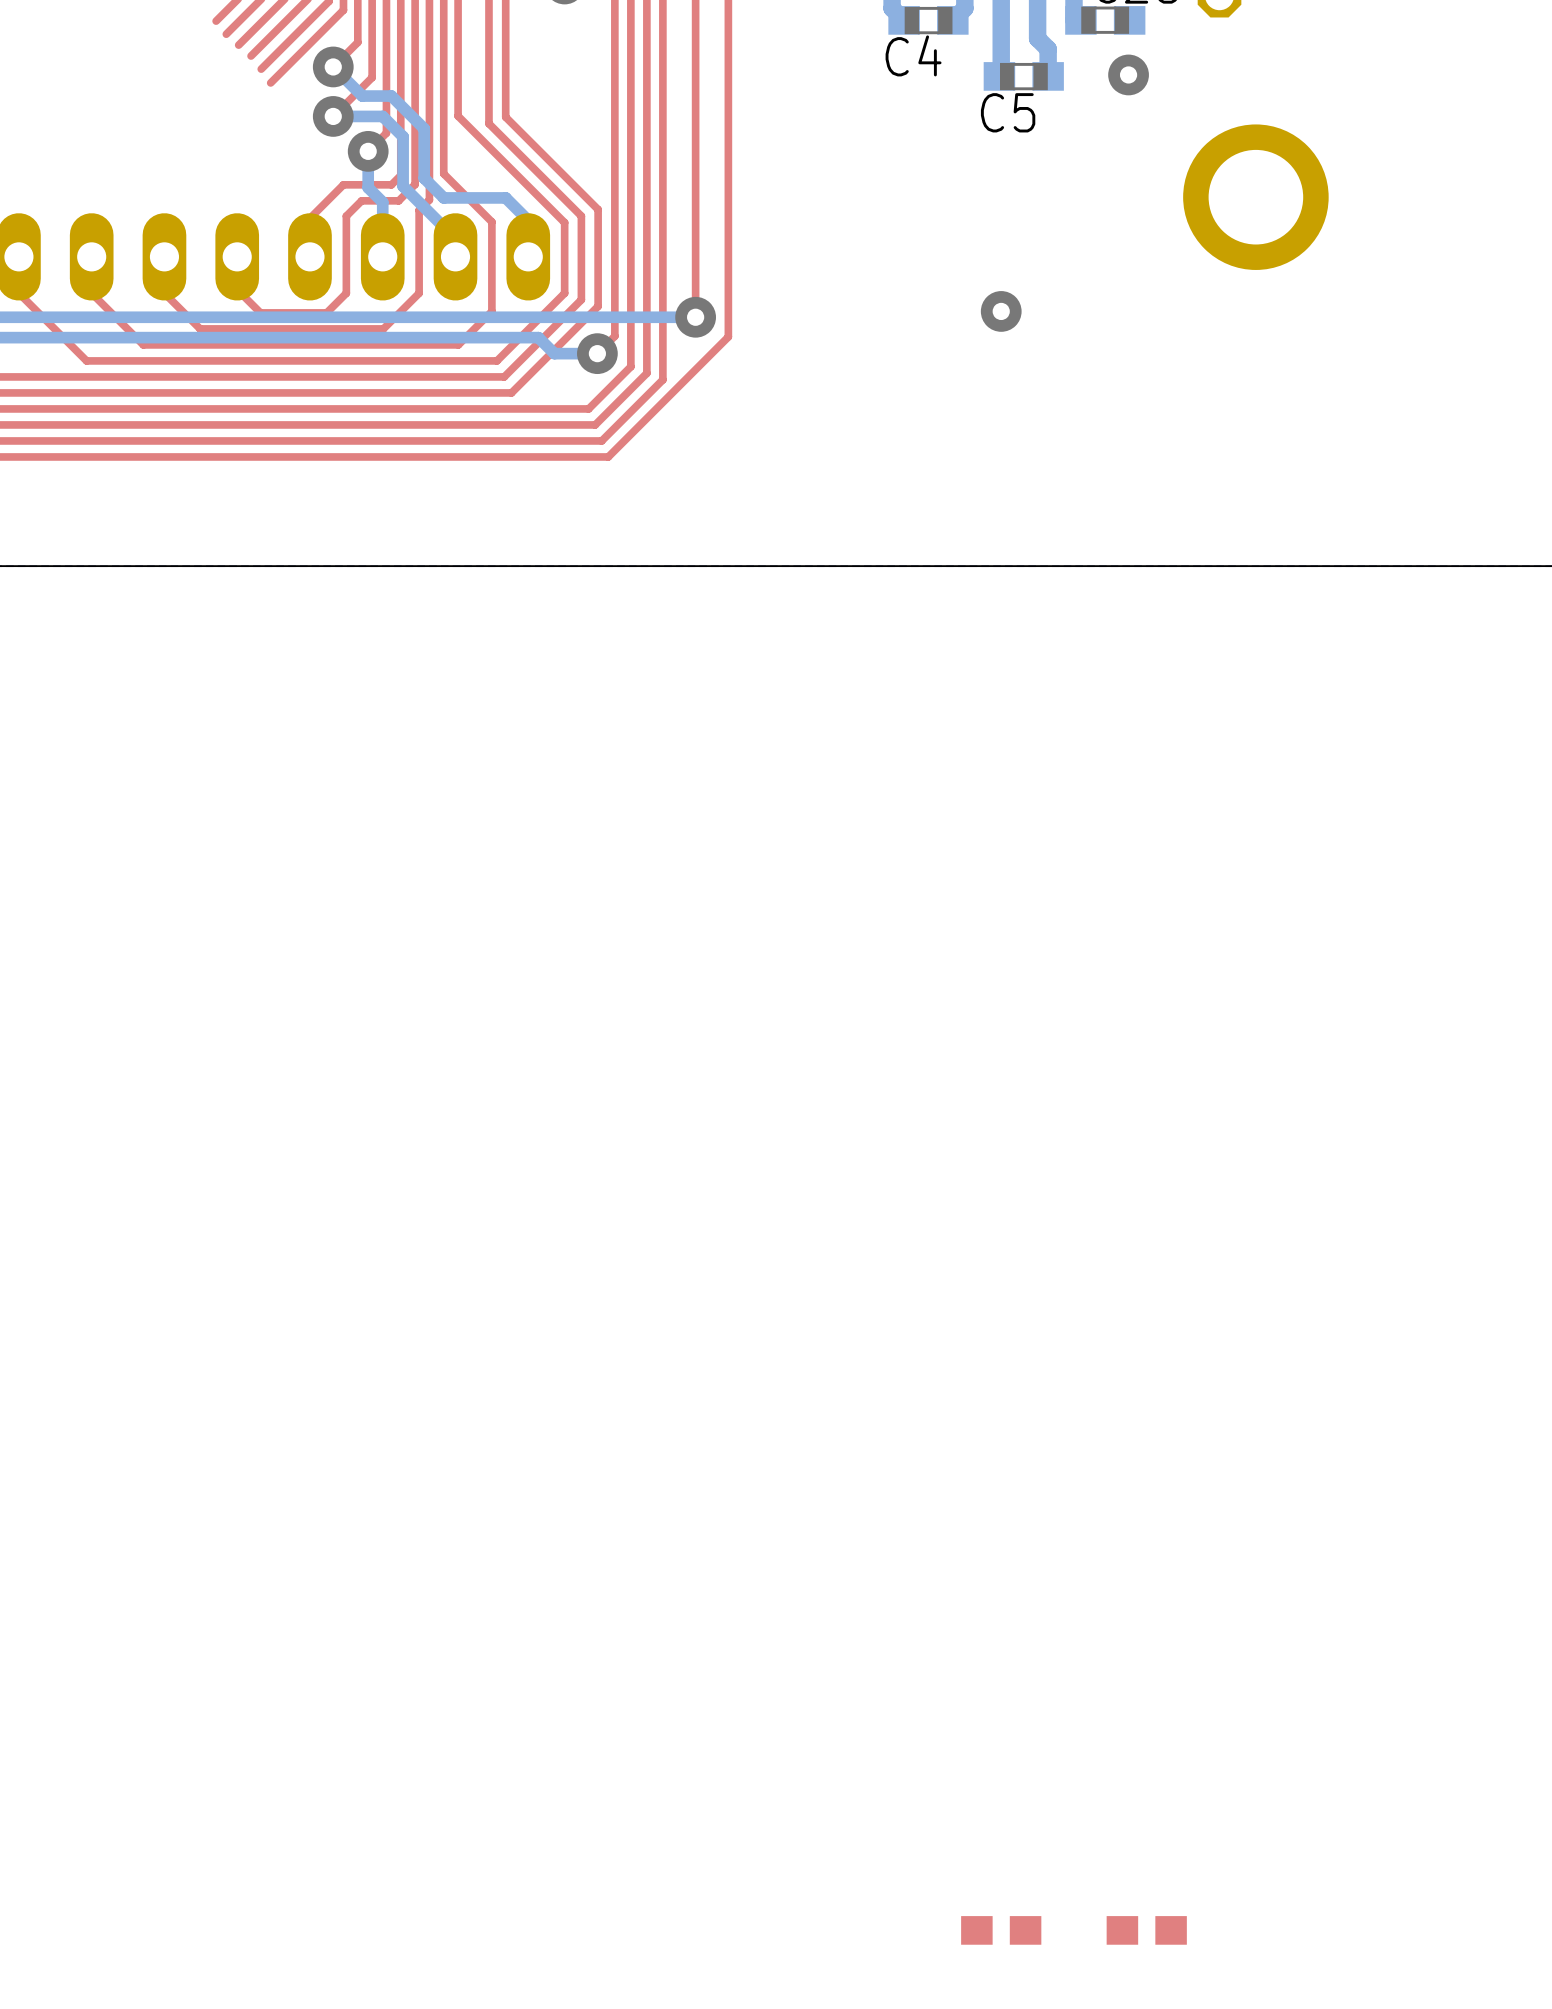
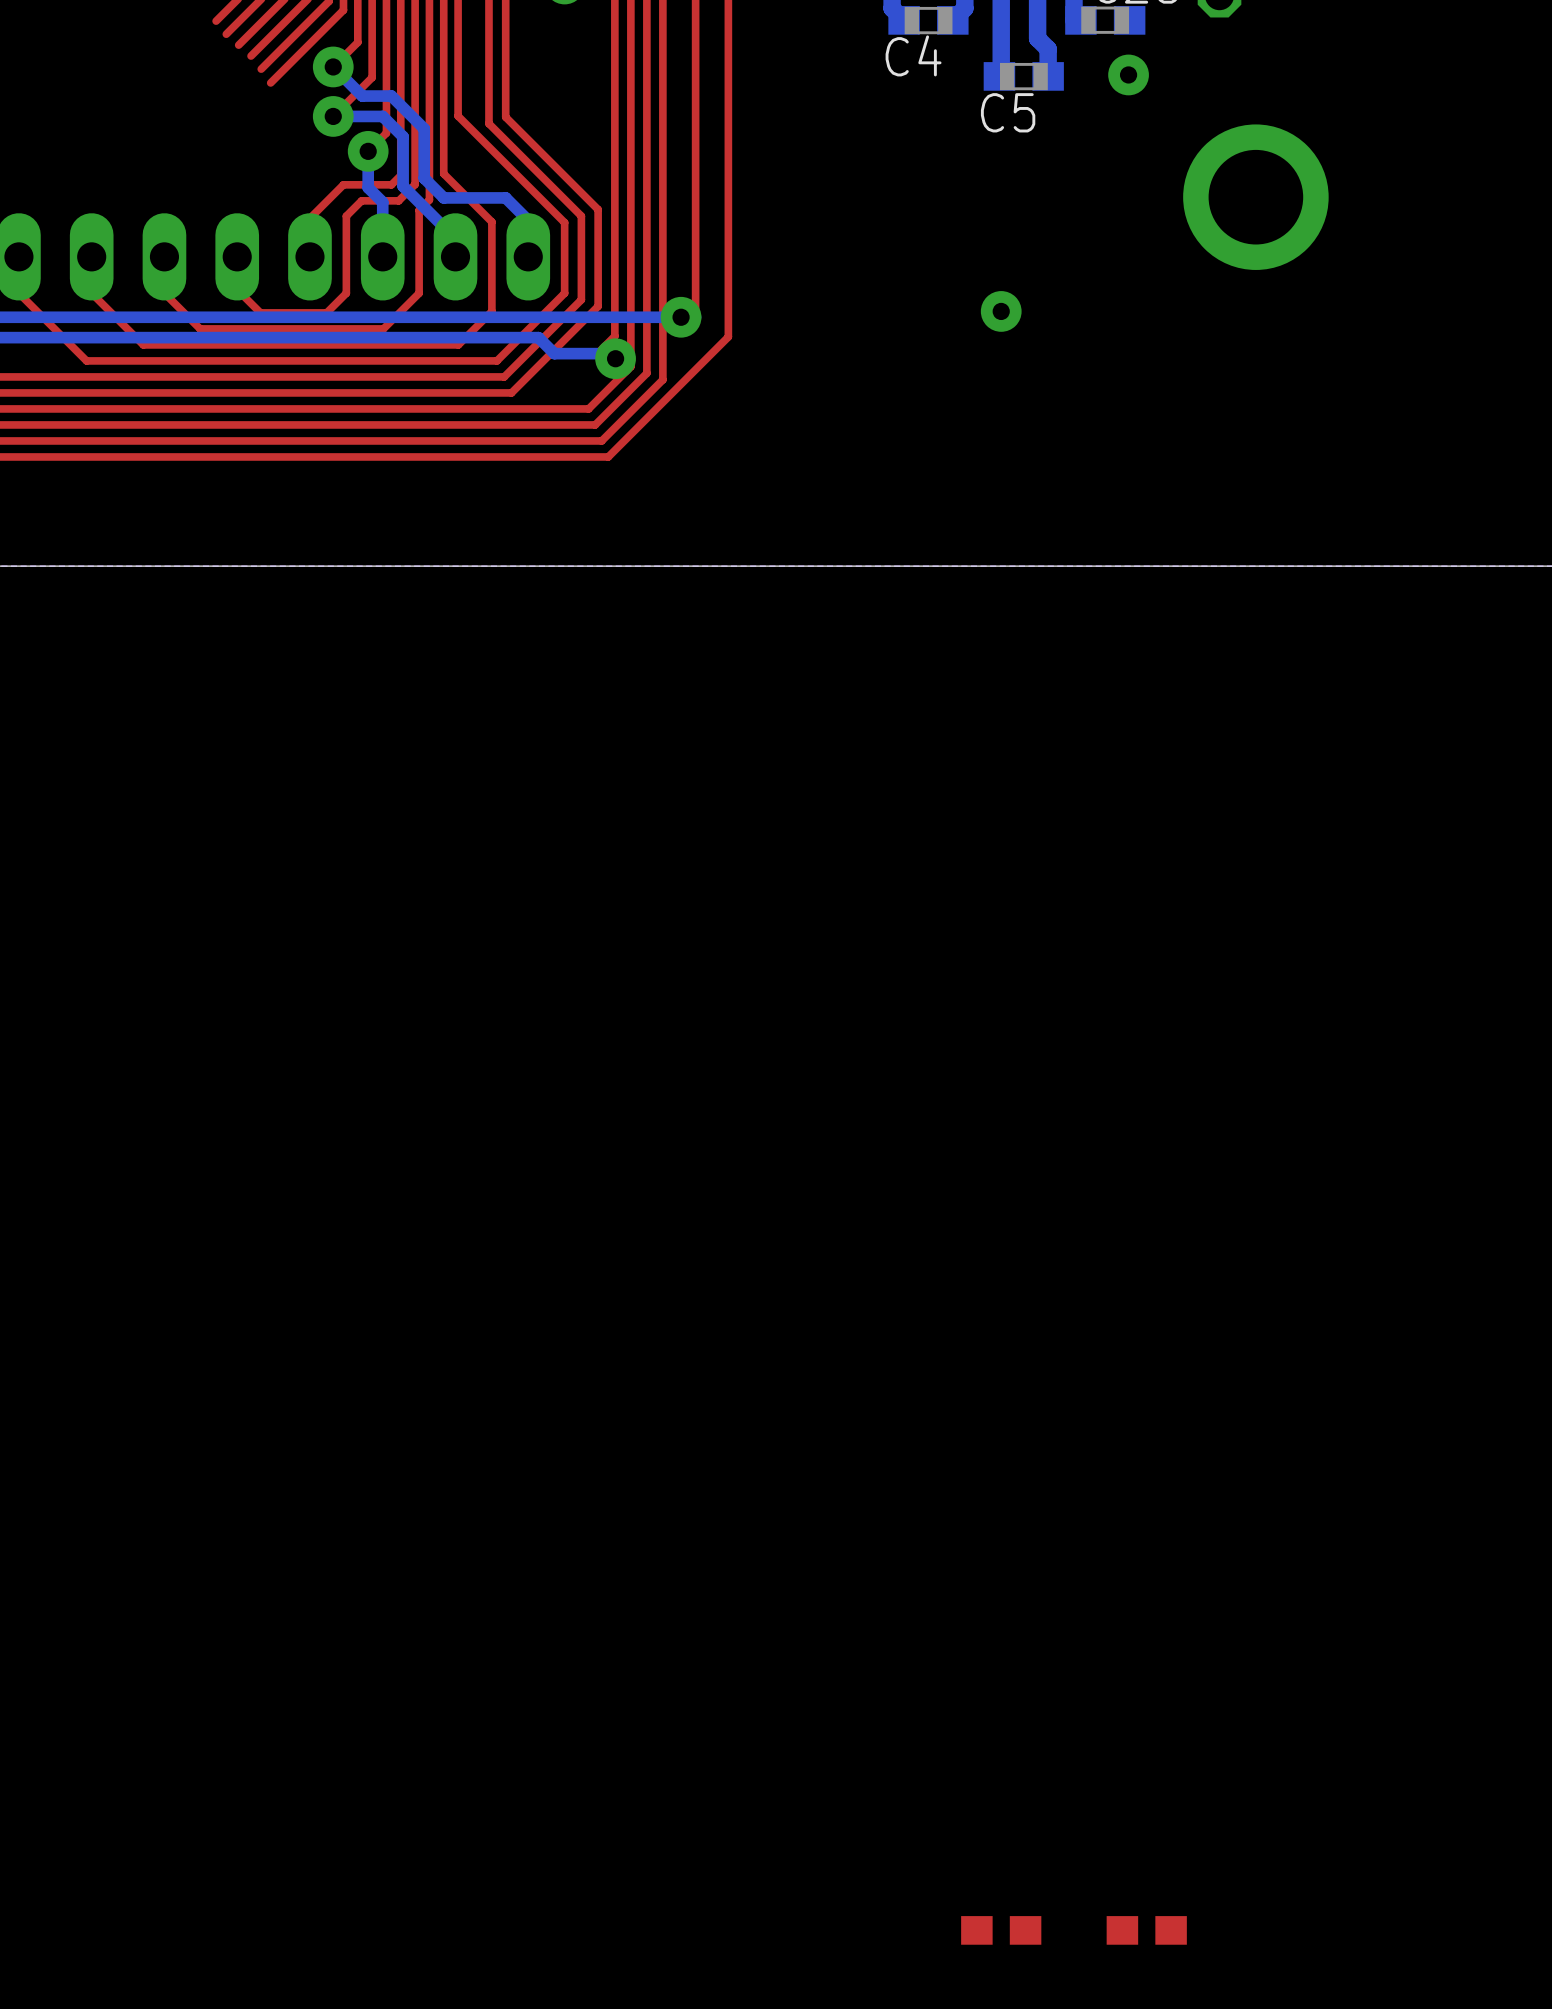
via position: (695, 317) -> (681, 317)
via position: (597, 353) -> (615, 358)

